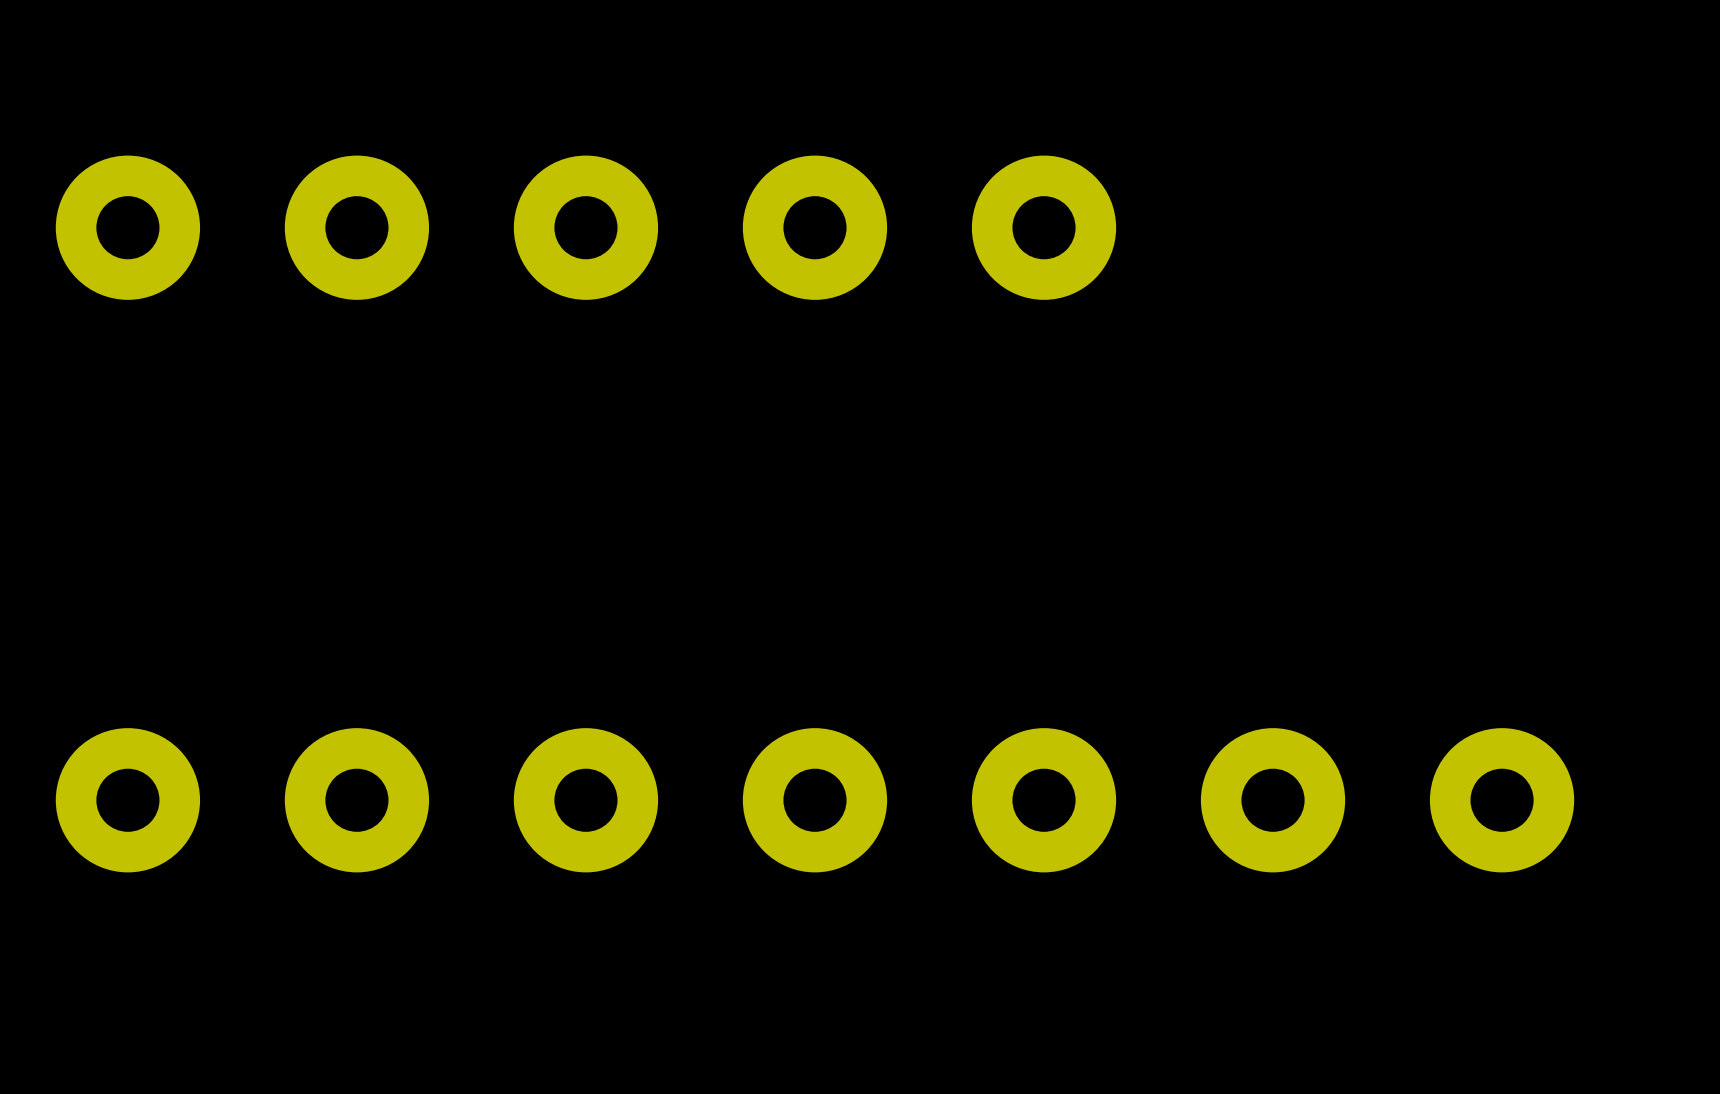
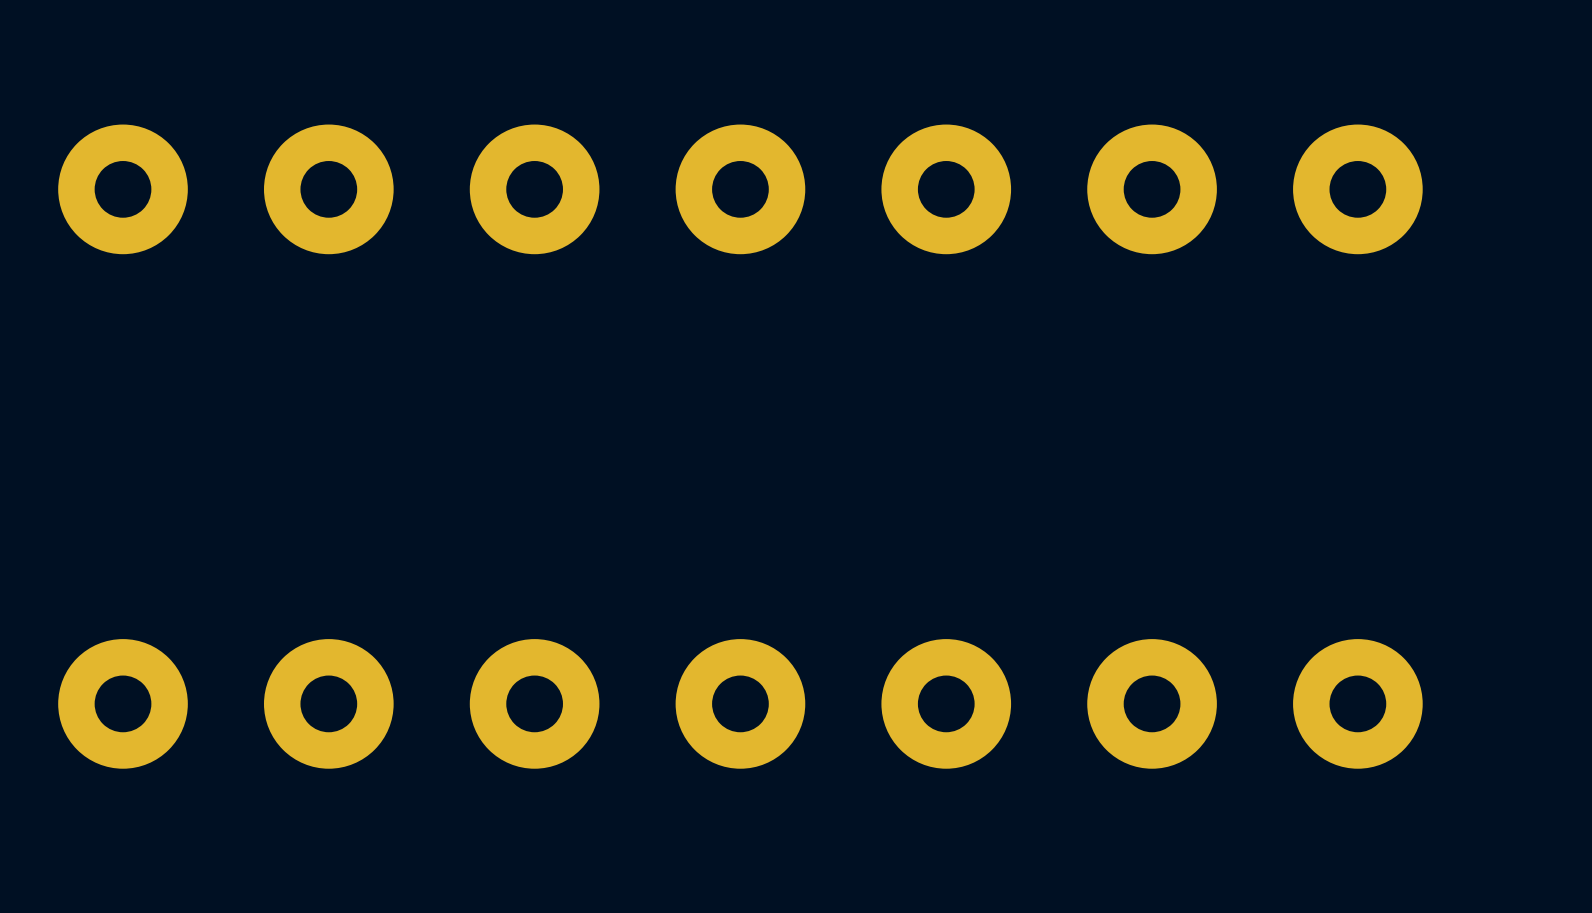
part: none -> (1152, 189)
part: none -> (1357, 189)

